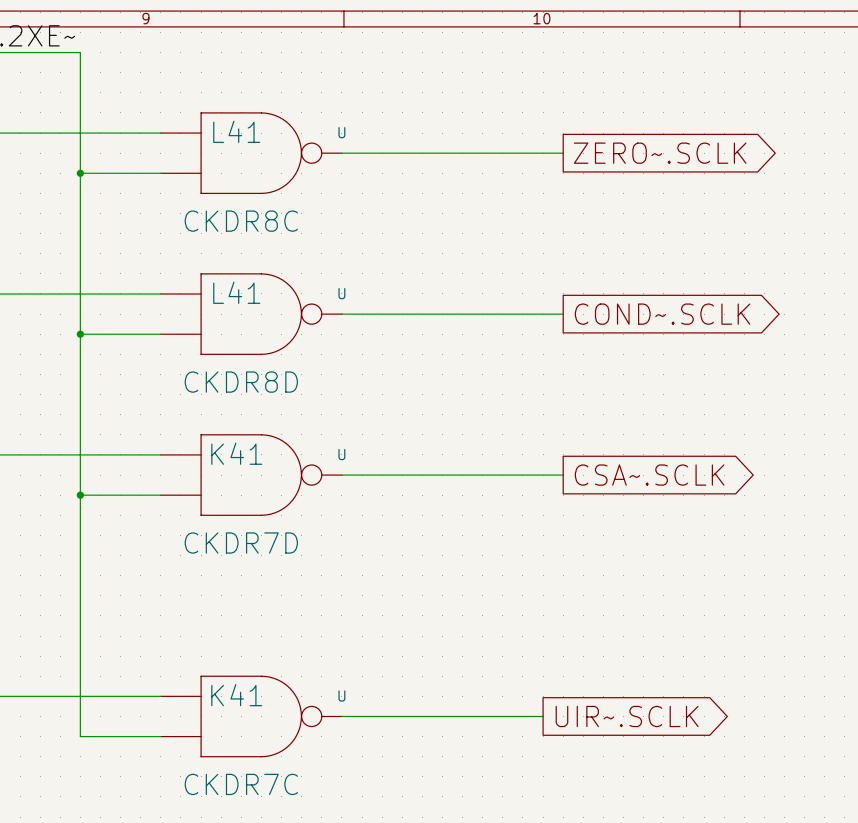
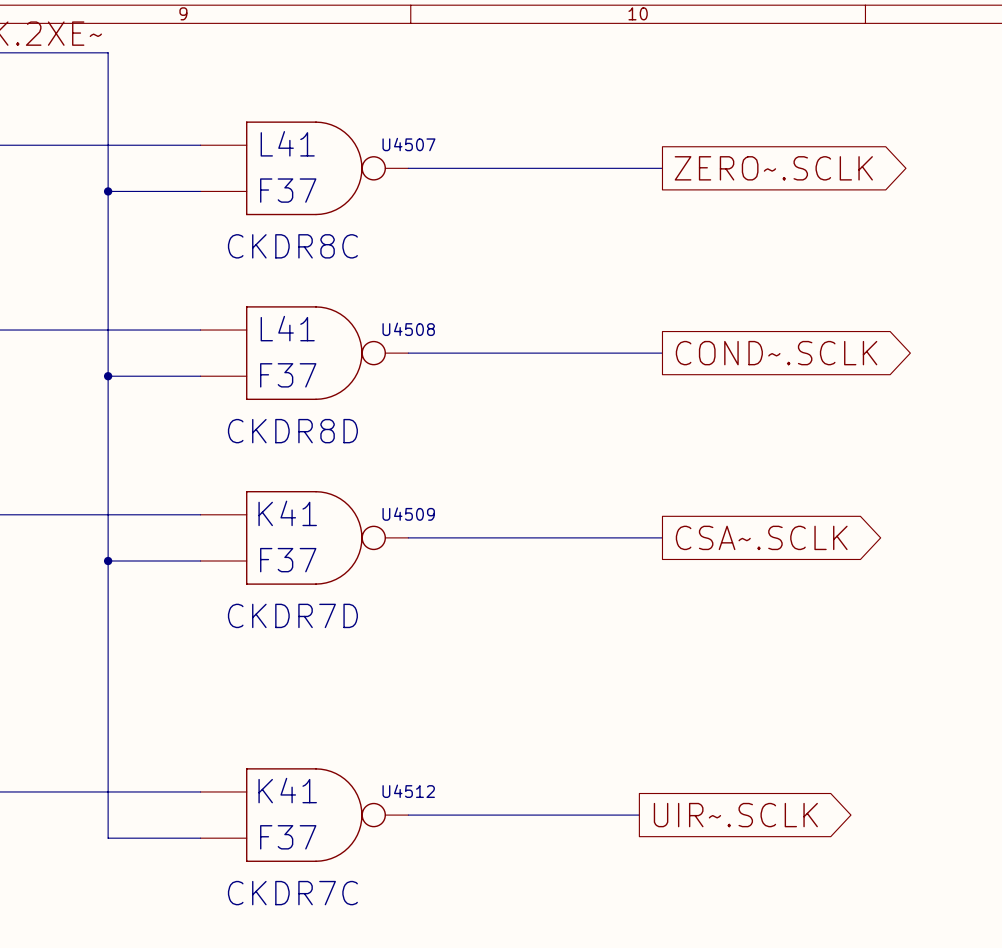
U name: U (341, 132) -> U4507 (408, 144)
U value: none -> F37 (288, 190)
U name: U (341, 293) -> U4508 (408, 329)
U value: none -> F37 (288, 375)
U name: U (341, 454) -> U4509 (408, 514)
U value: none -> F37 (288, 560)
U name: U (341, 695) -> U4512 (408, 791)
U value: none -> F37 (288, 837)

